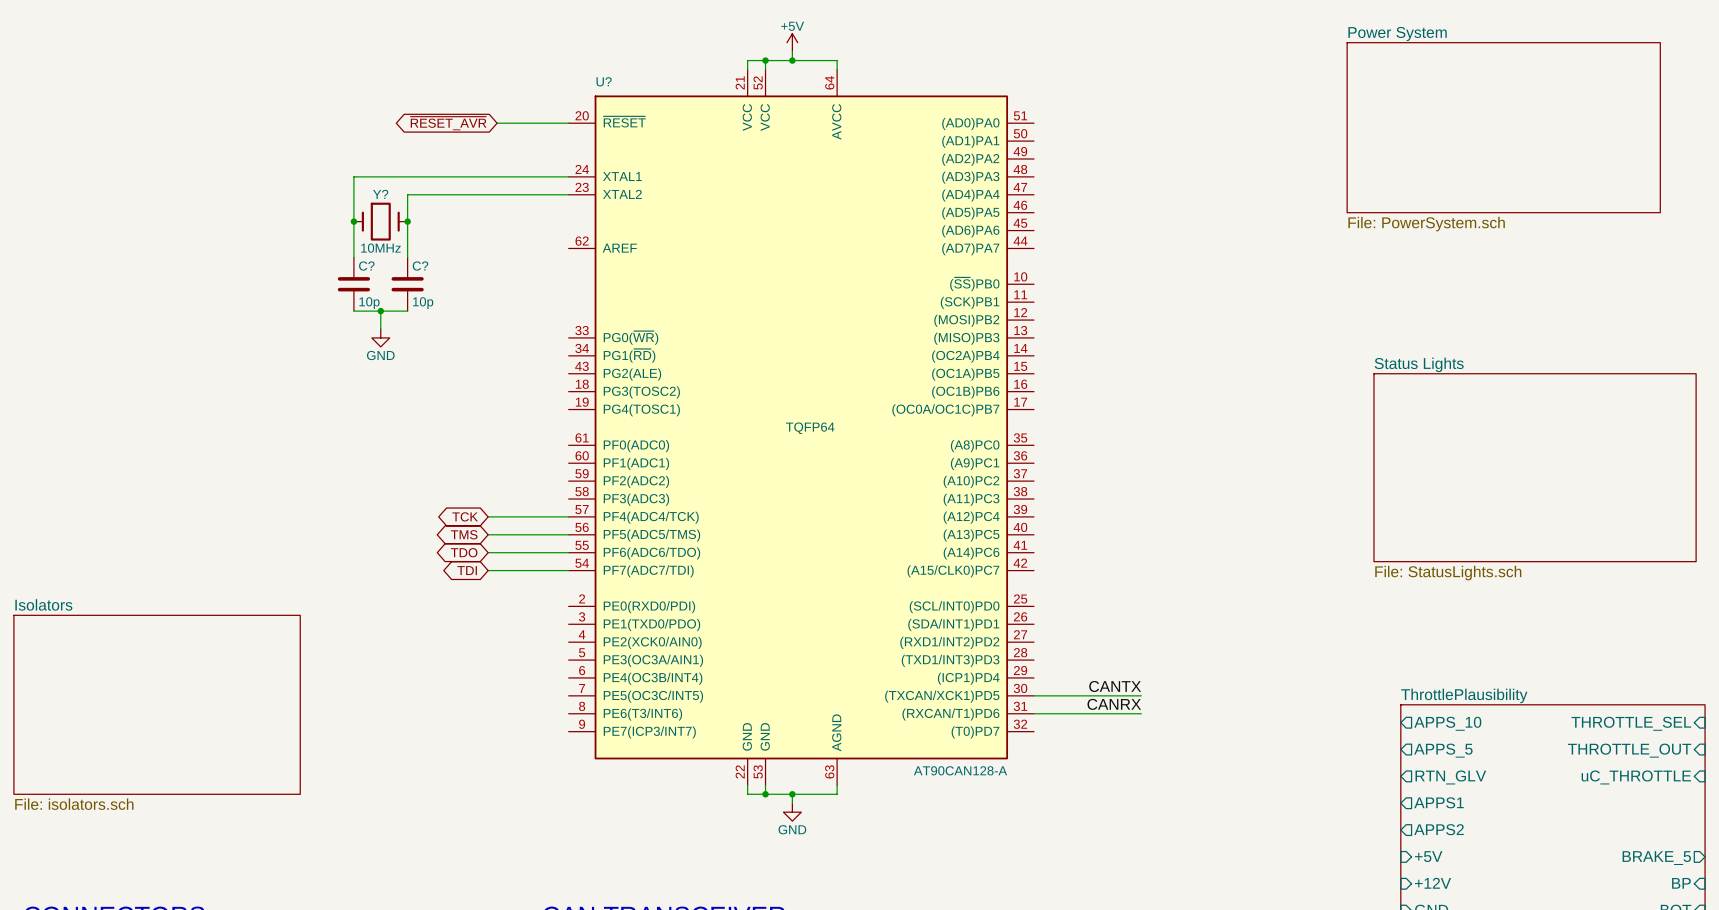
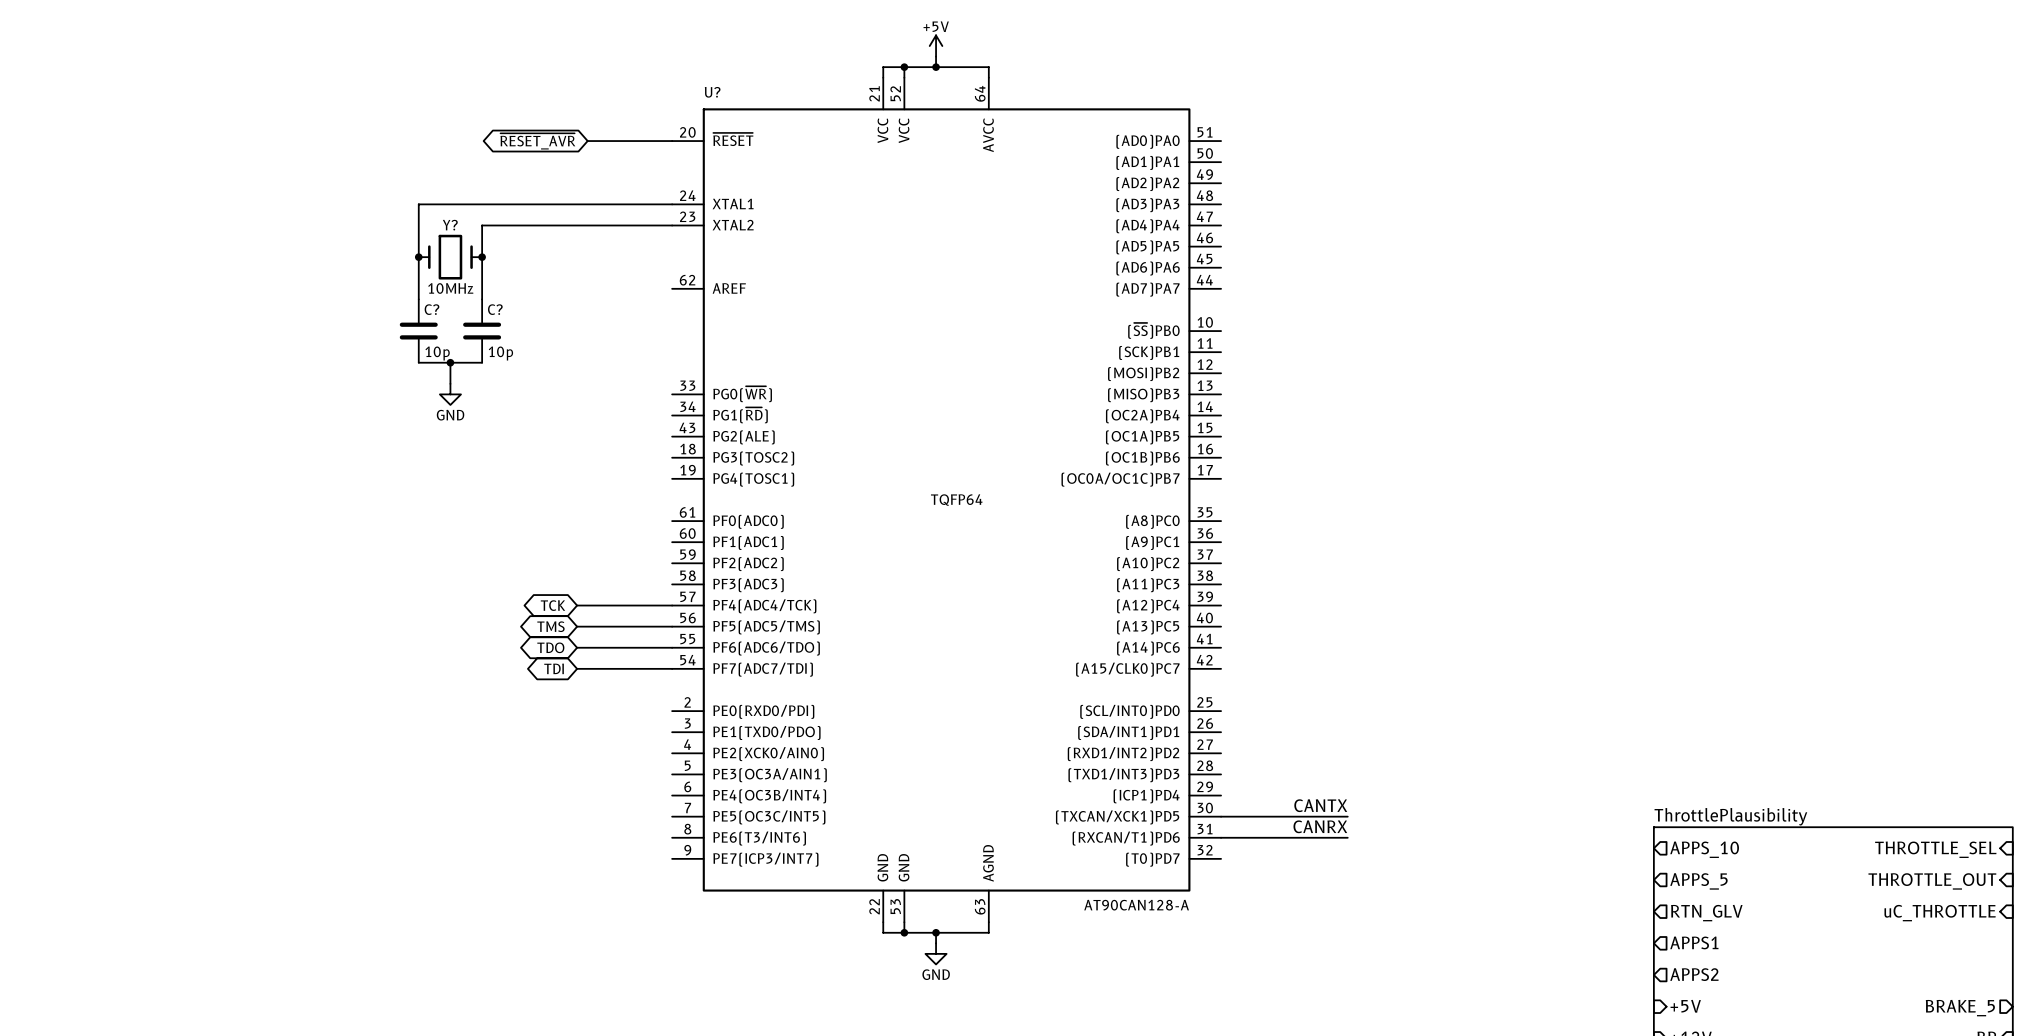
sheet Power System: File: PowerSystem.sch (1503, 127) -> none
sheet Status Lights: File: StatusLights.sch (1535, 467) -> none
sheet Isolators: File: isolators.sch (157, 704) -> none

